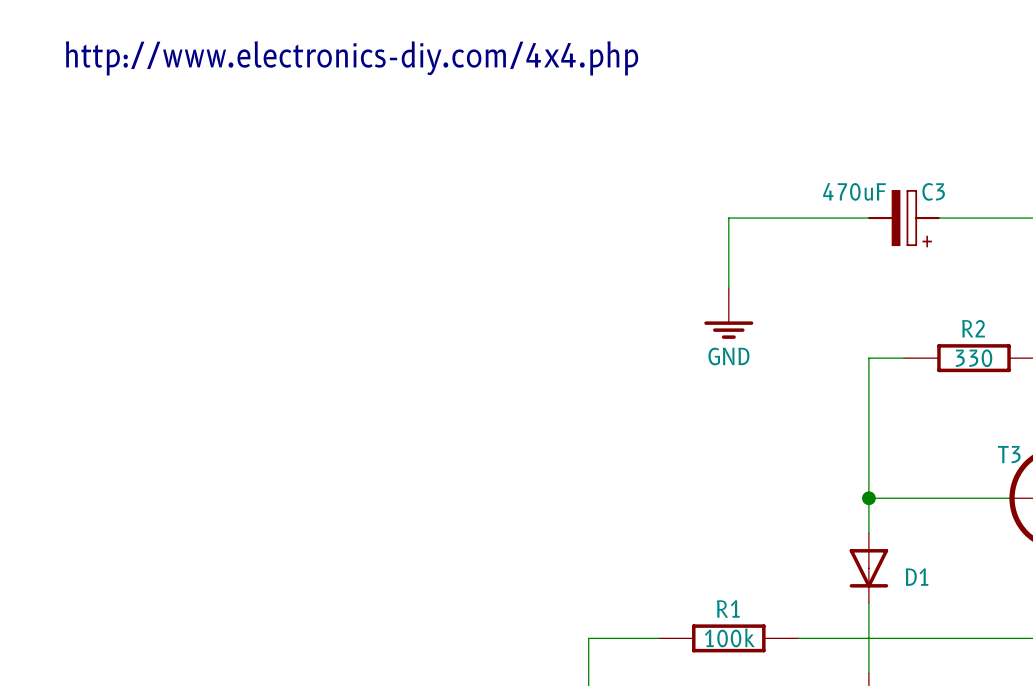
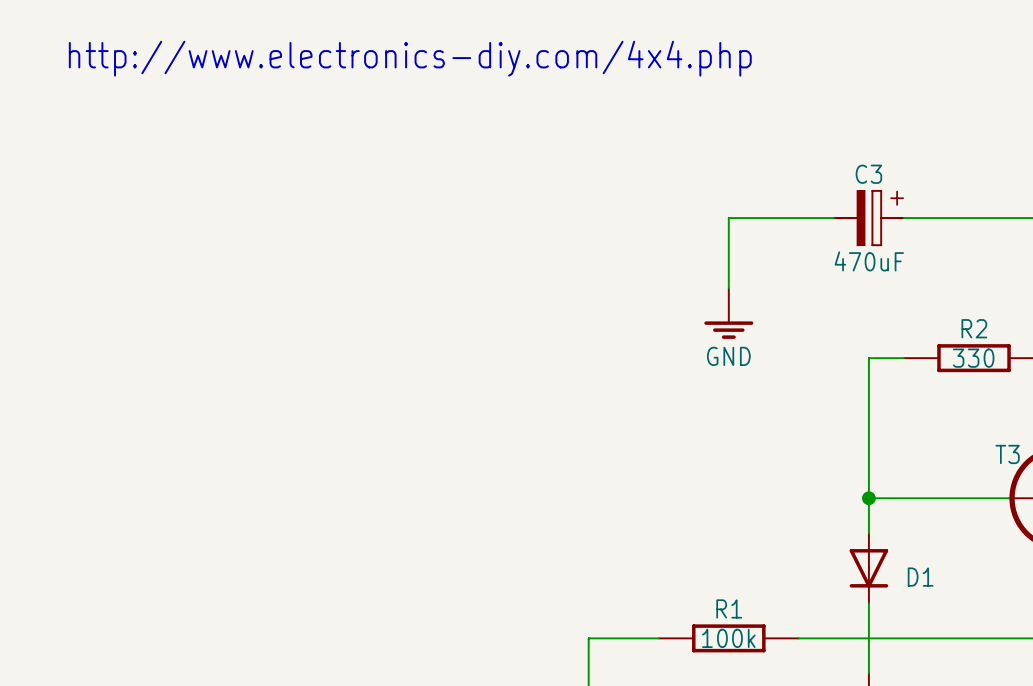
C3 value position: 470uF (854, 191) -> 470uF (869, 261)
C3 name position: C3 (933, 191) -> C3 (868, 174)
C3 position: (903, 218) -> (868, 218)
C3 text position: + (927, 241) -> + (897, 198)

